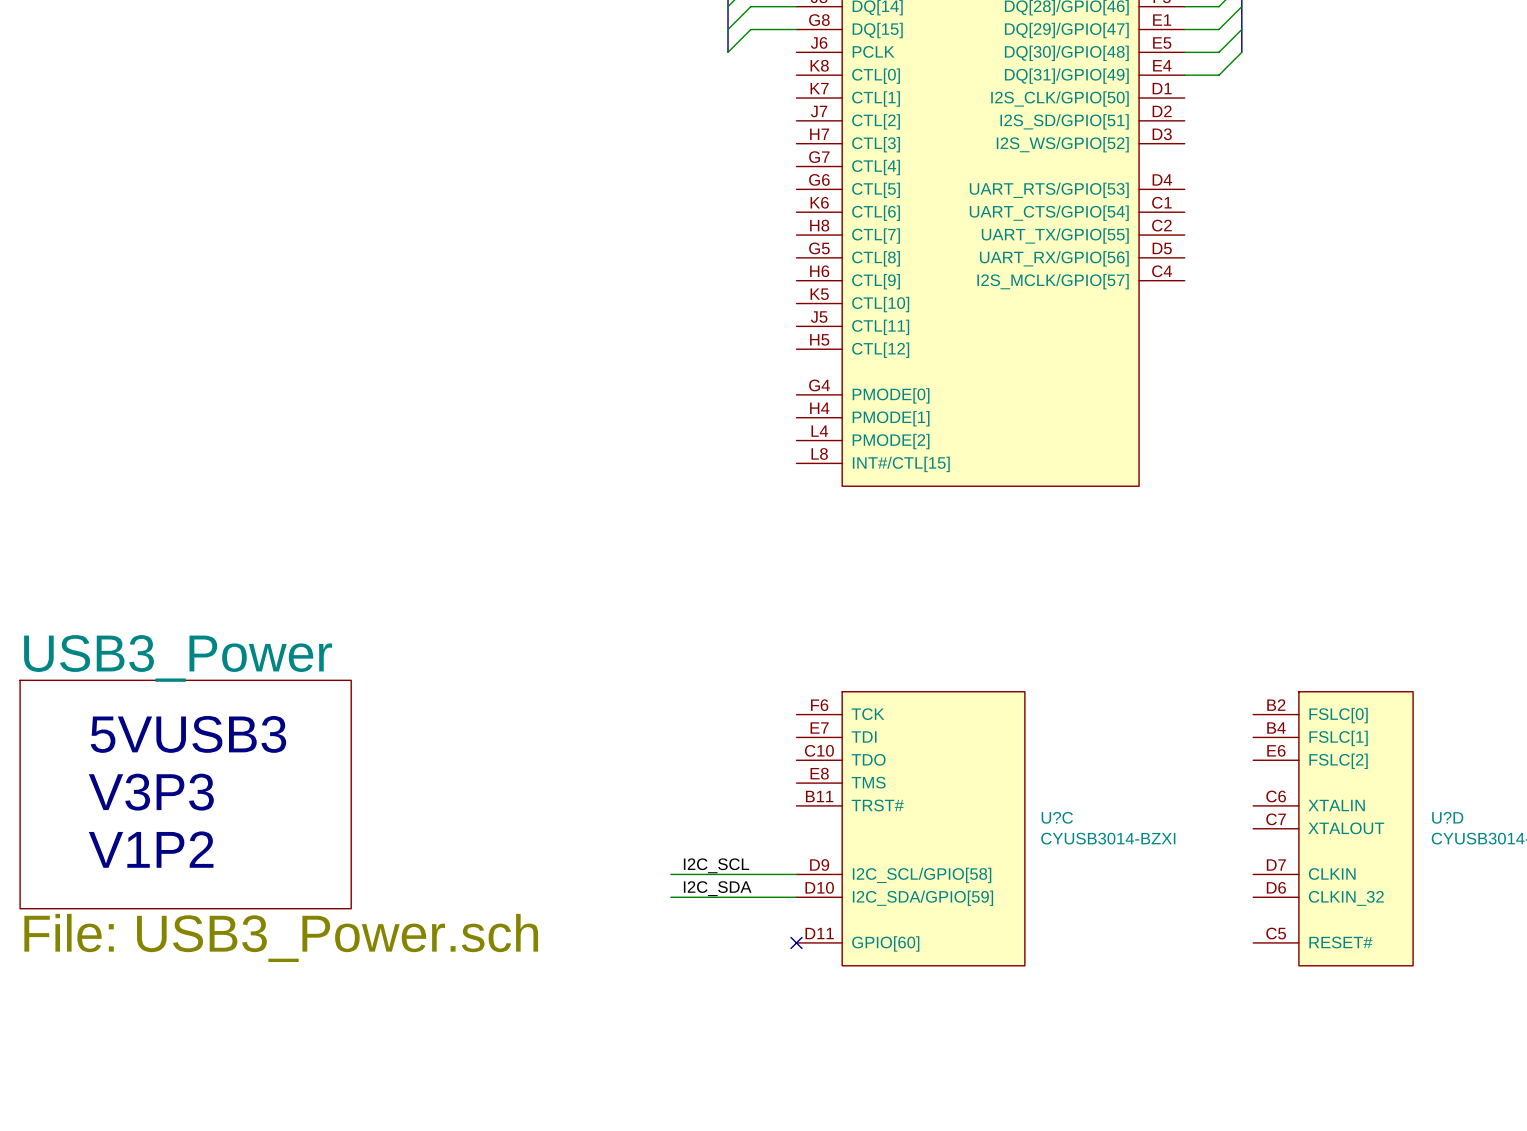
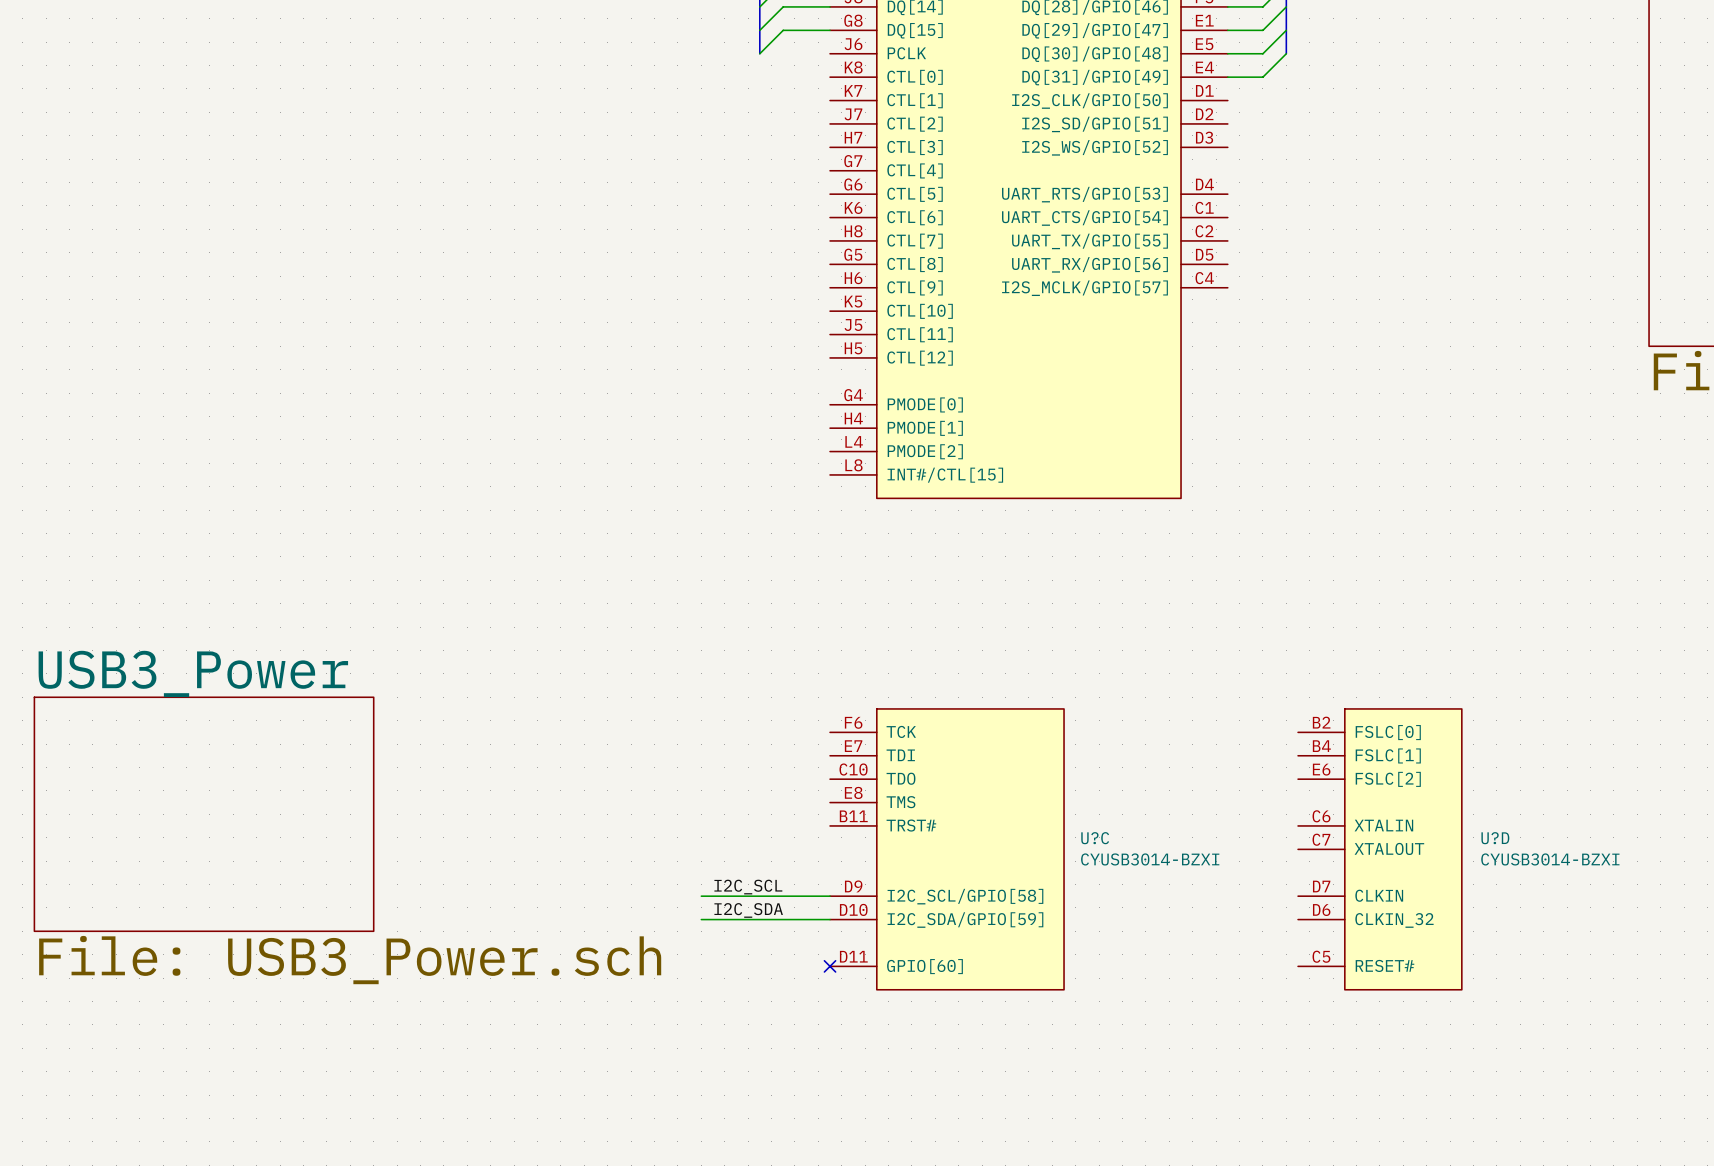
text: 5VUSB3 (188, 734) -> none
text: V3P3 (151, 792) -> none
text: V1P2 (151, 849) -> none

